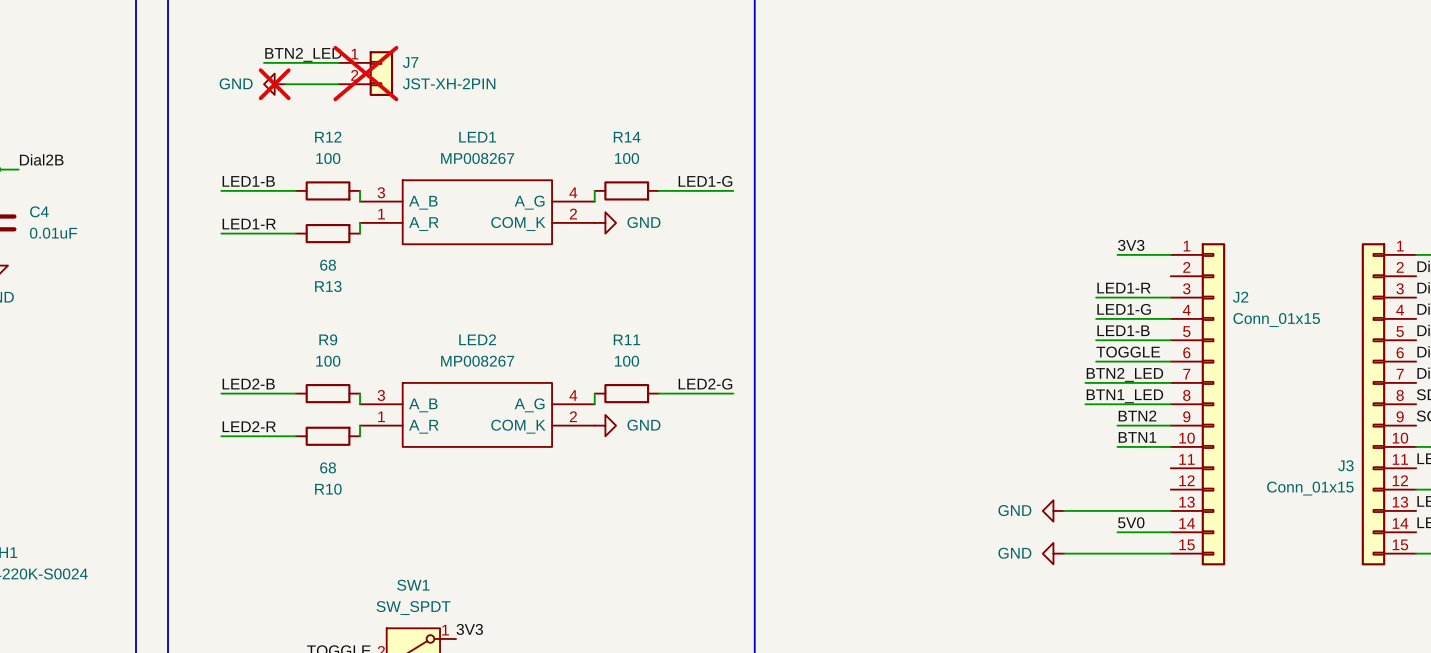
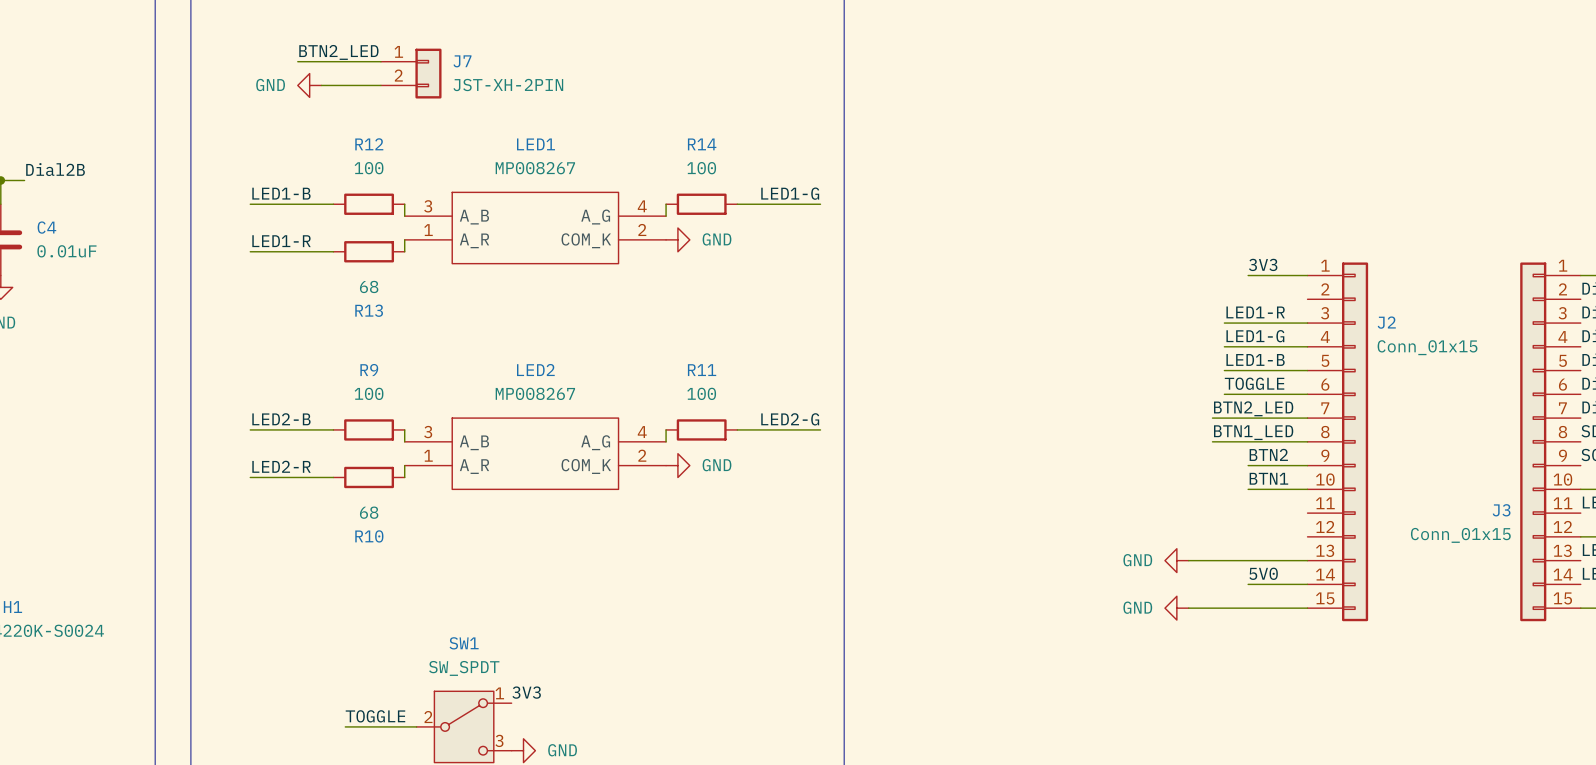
J7 do-not-place cross: (365, 73) -> none
power symbol do-not-place cross: (274, 84) -> none

